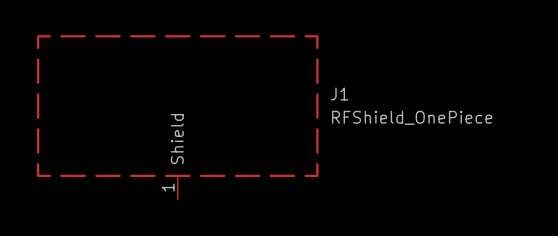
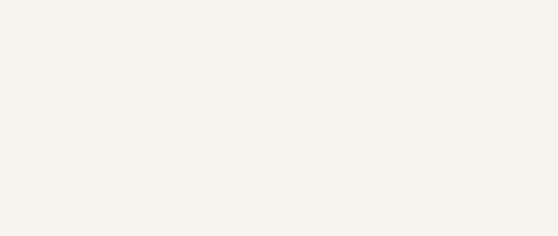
J1: RFShield_OnePiece (177, 117) -> none

